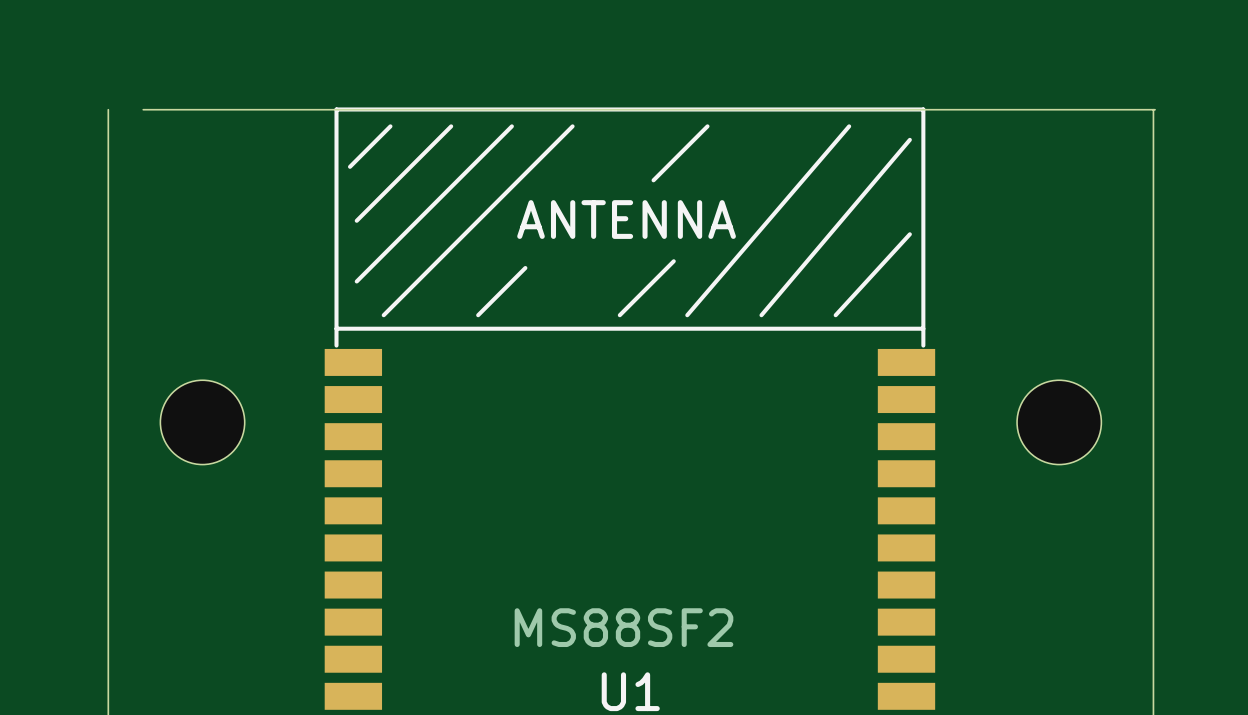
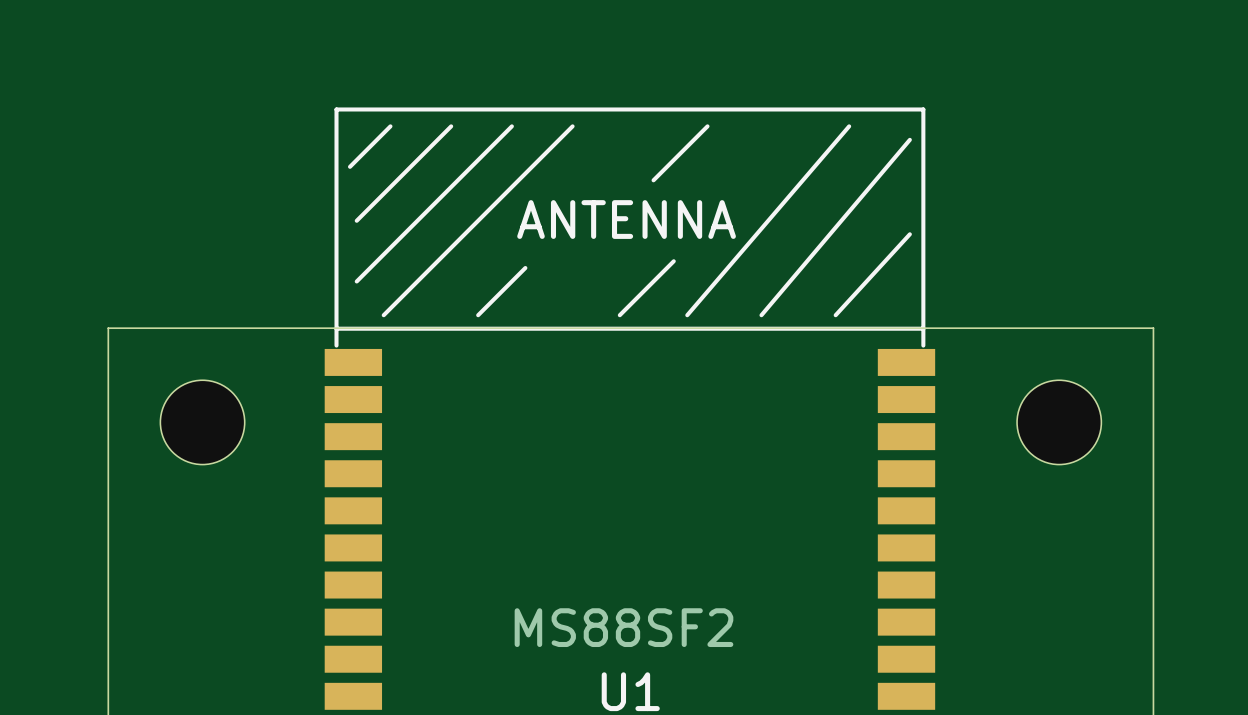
board edge: (108, 109) (108, 328) -> none
board edge: (1153, 109) (1153, 328) -> (108, 328) (1153, 328)
board edge: (1155, 109) (143, 109) -> none

